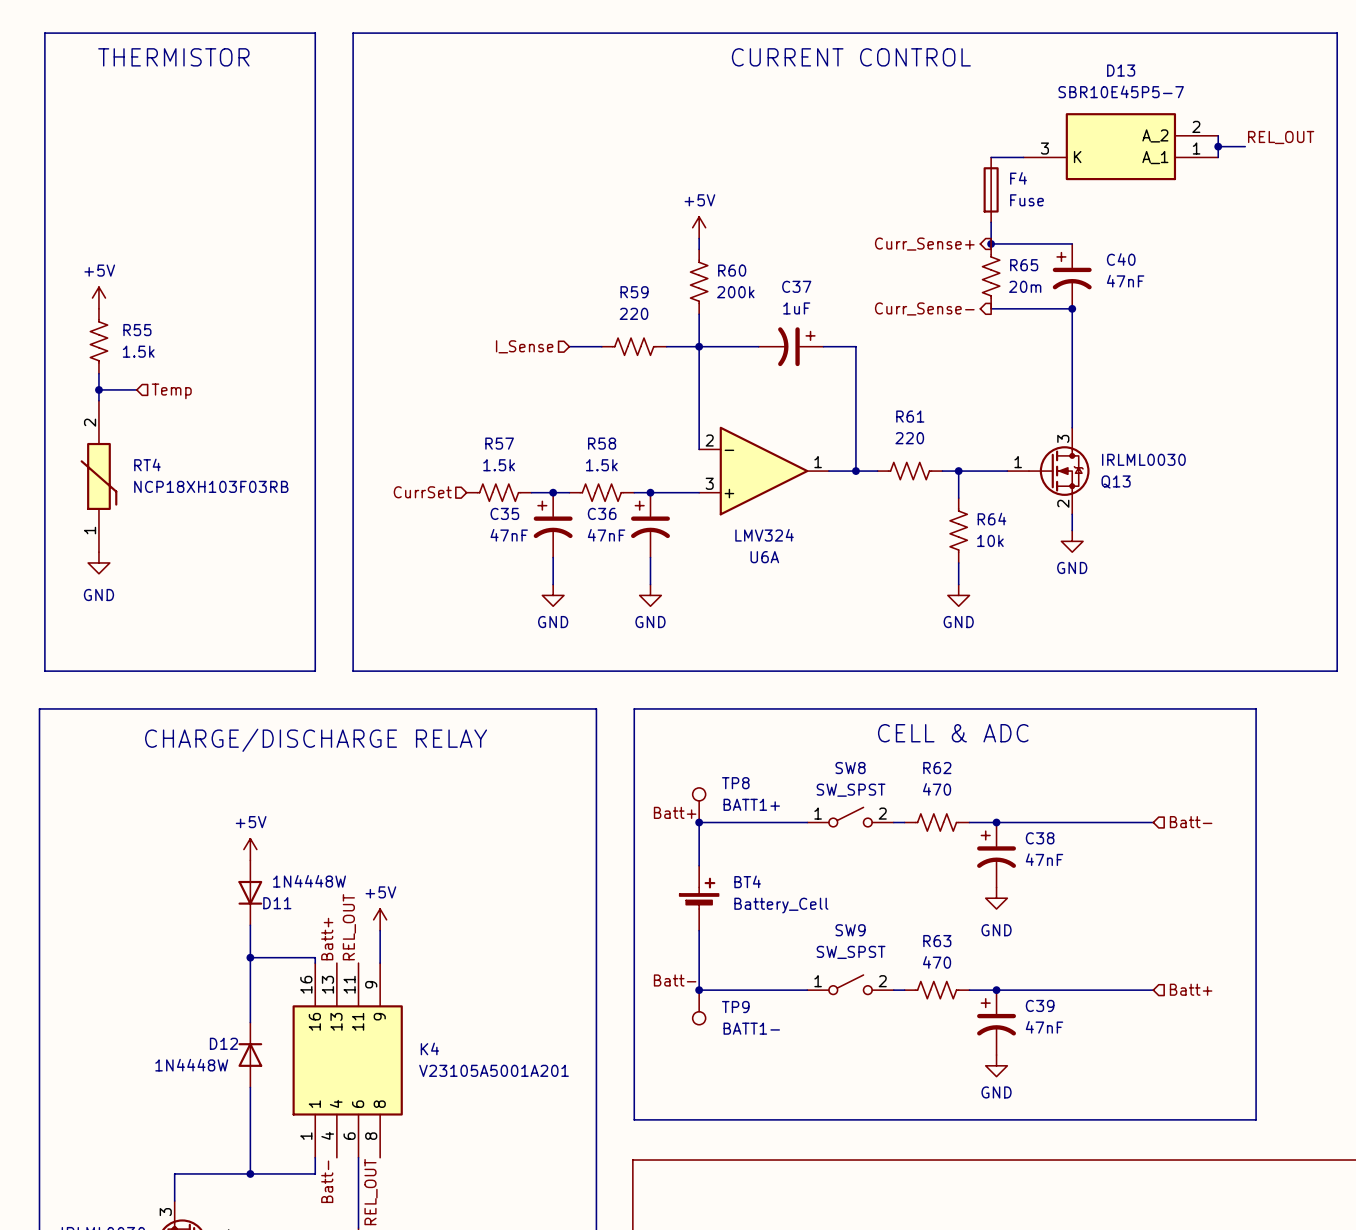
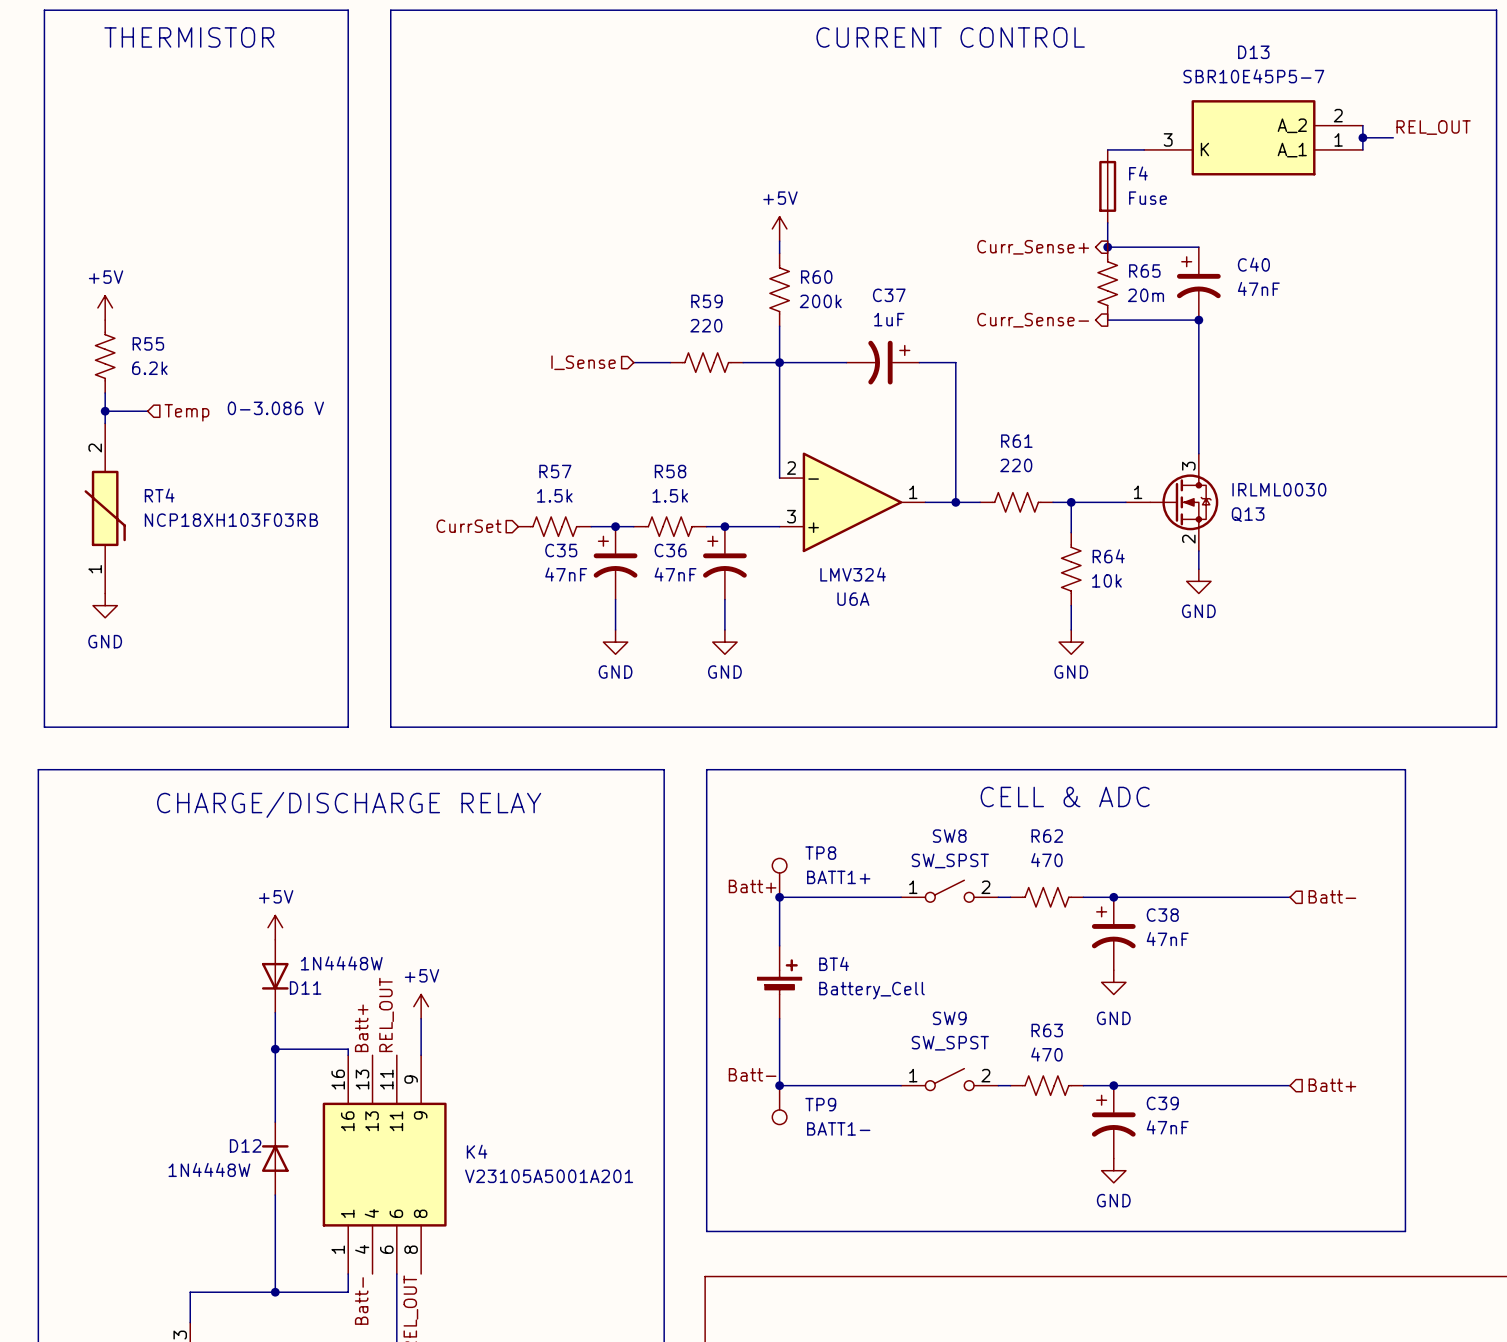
R55 value: 1.5k (138, 351) -> 6.2k (149, 368)
text: none -> 0-3.086 V (275, 408)

